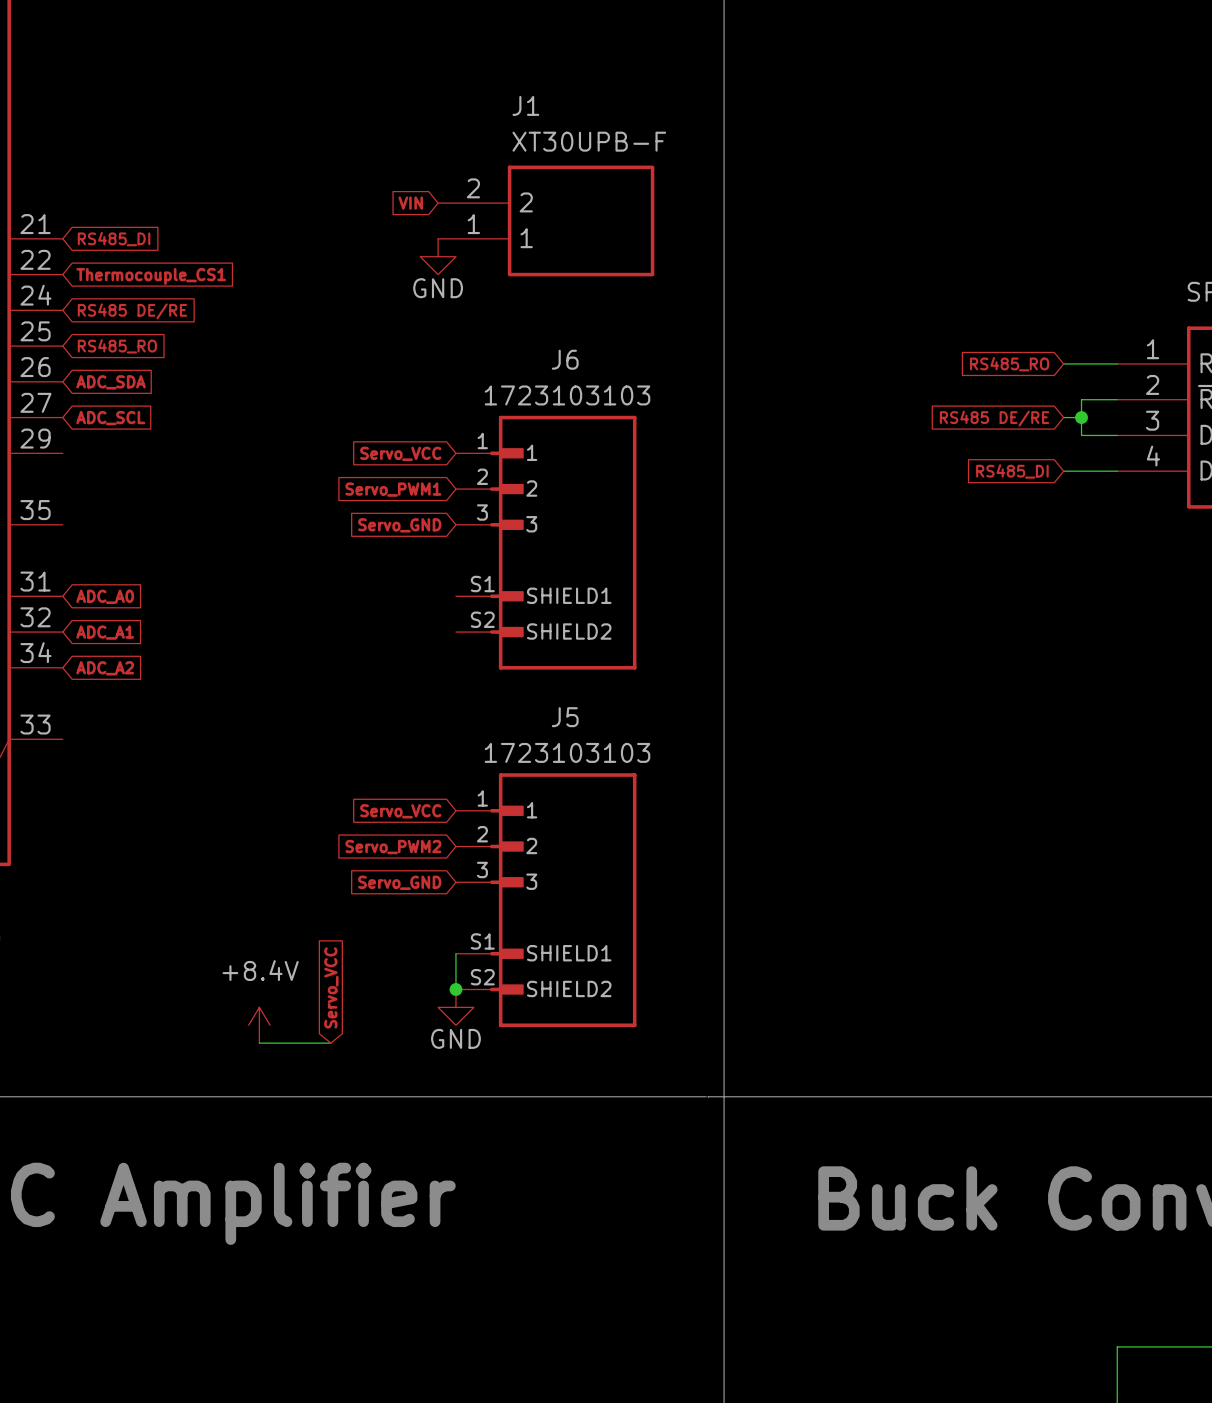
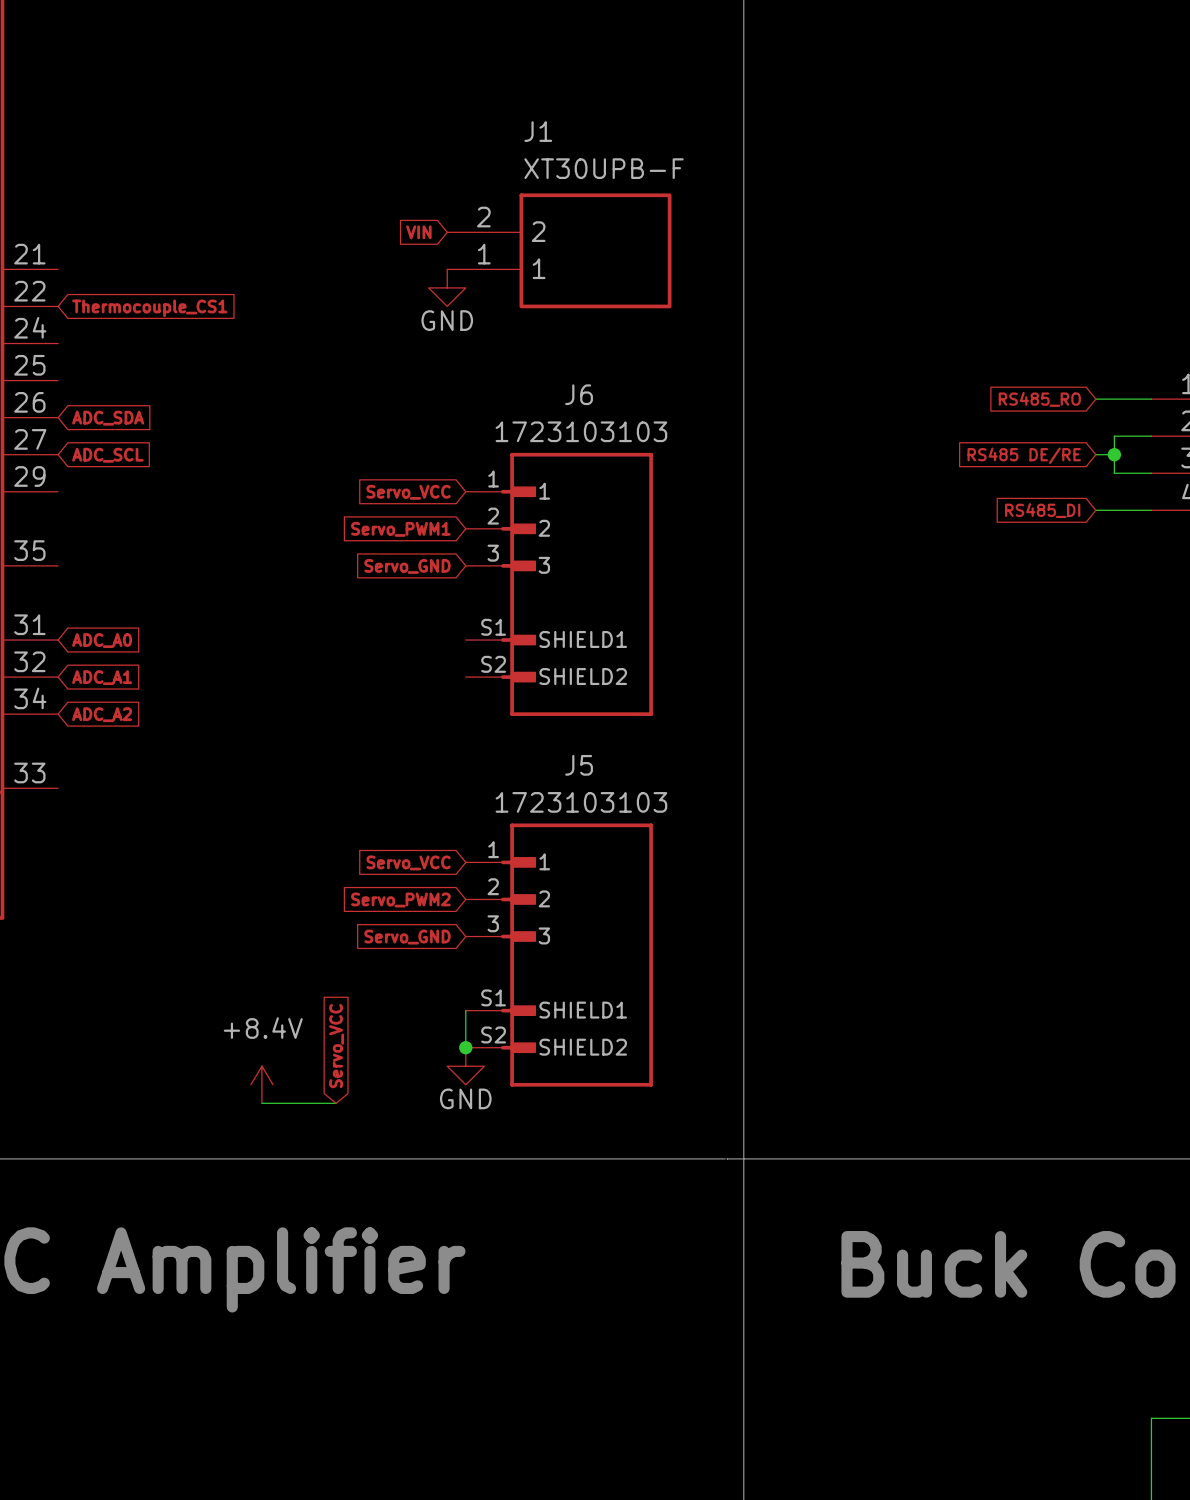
global label: RS485_DI (114, 239) -> none
global label: RS485 DE/RE (132, 311) -> none
global label: RS485_RO (117, 346) -> none

